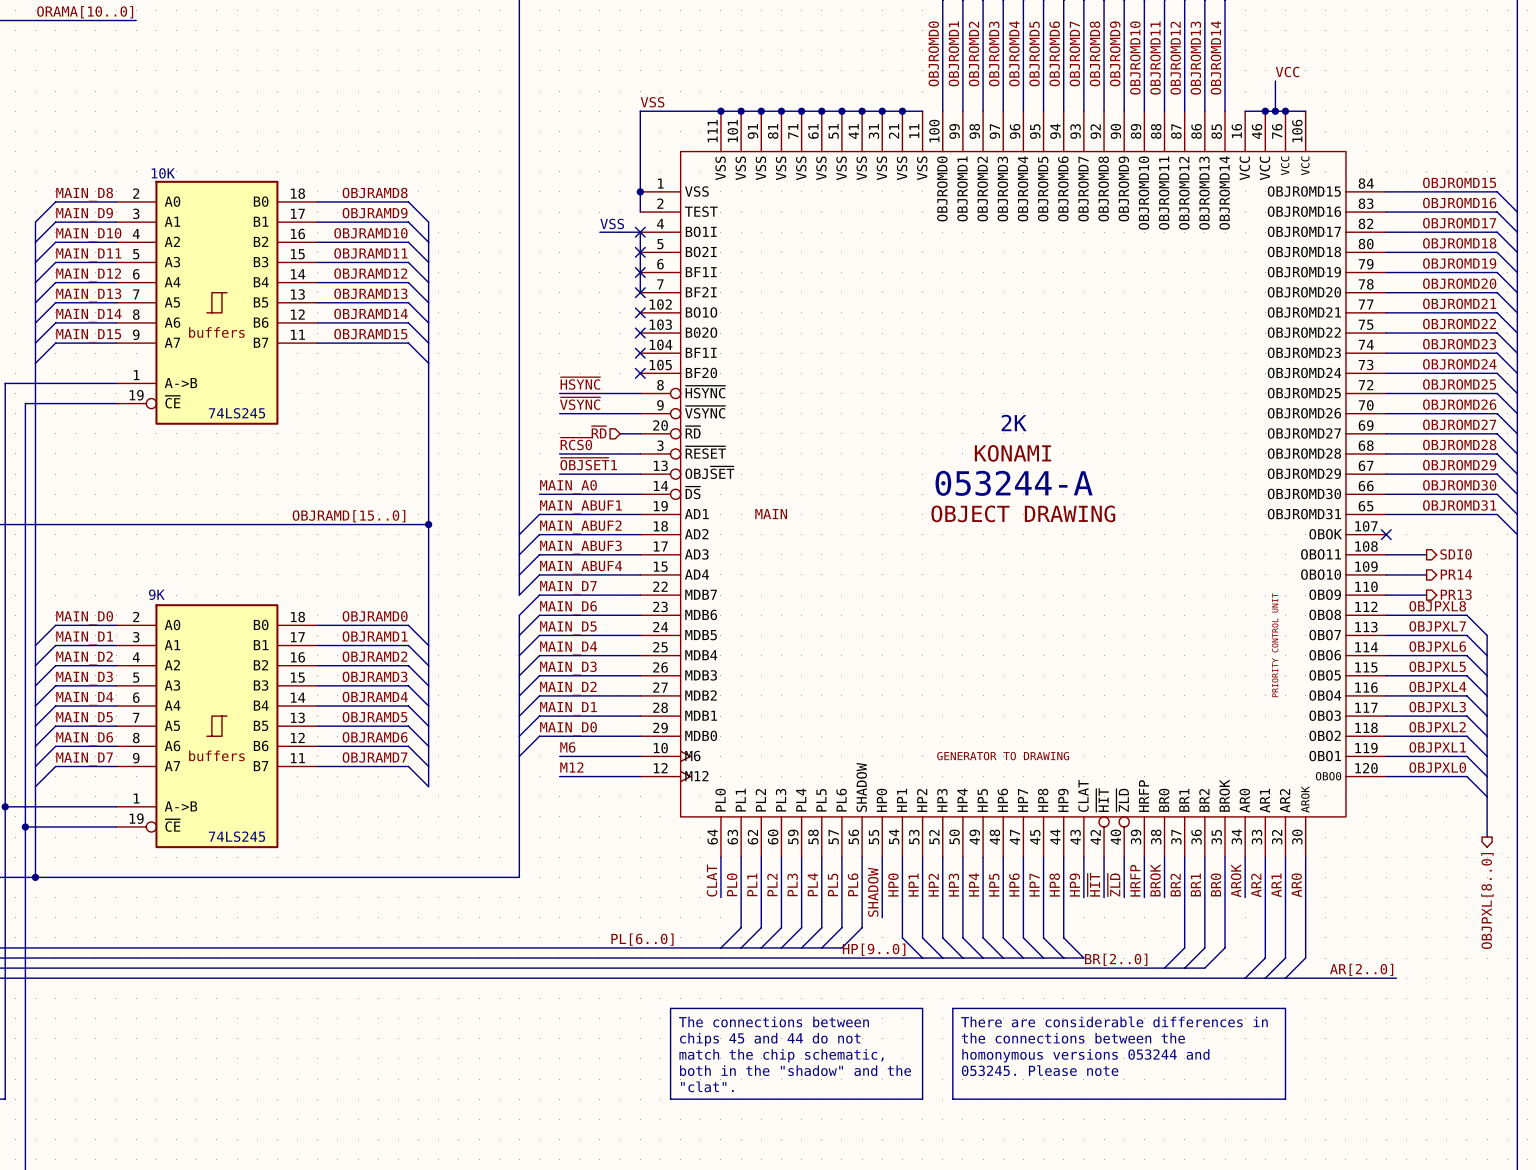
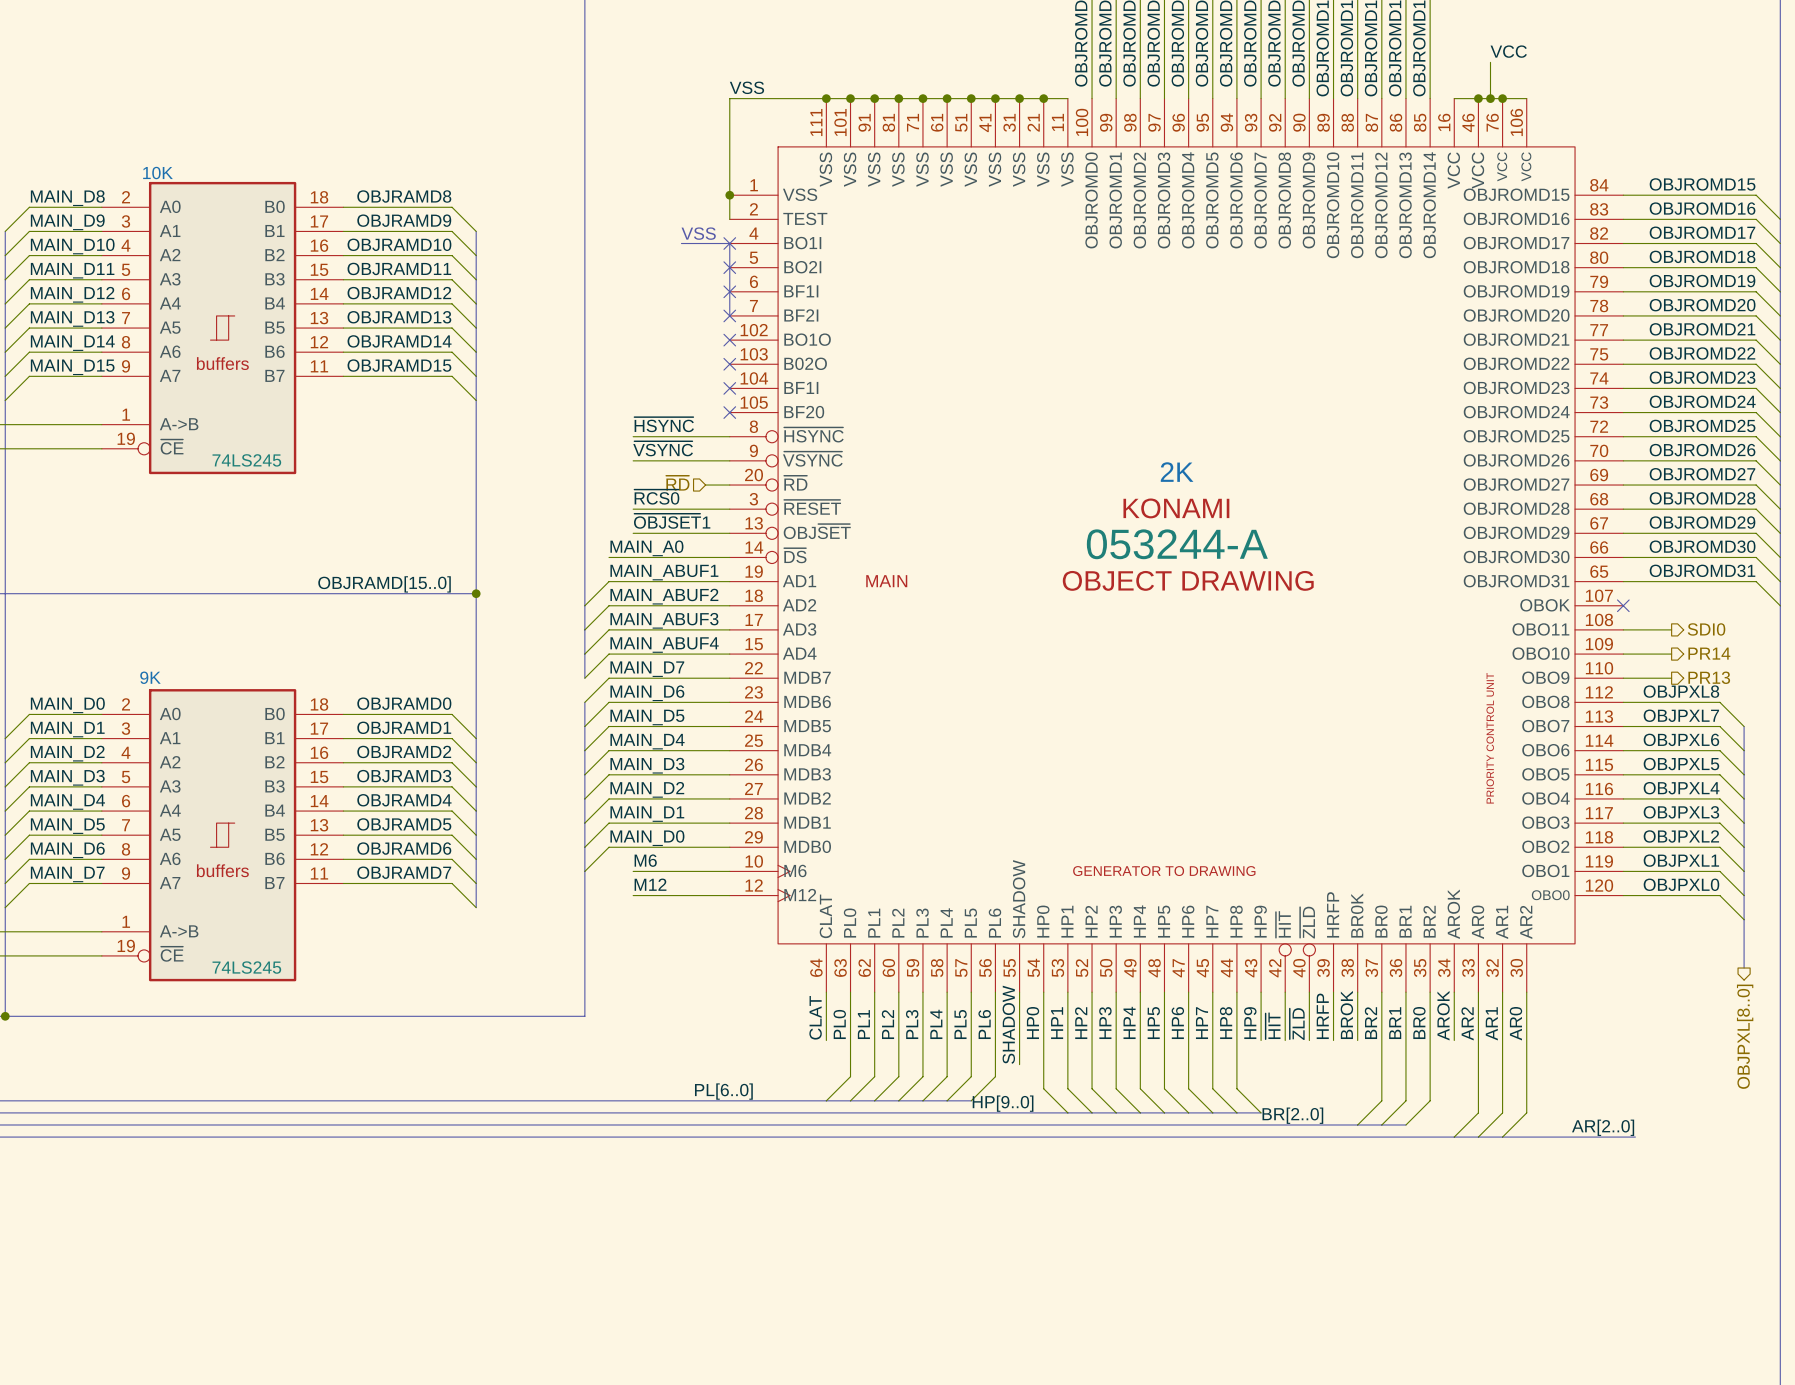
2K symbol: [640, 111, 1387, 858] -> [729, 98, 1624, 993]
line: (670, 1008) (922, 1008) (922, 1099) (670, 1099) (670, 1008) -> none
line: (952, 1008) (1285, 1008) (1285, 1099) (952, 1099) (952, 1008) -> none
text: There are considerable differences in (1114, 1021) -> none
text: The connections between (774, 1022) -> none
text: the connections between the (1073, 1038) -> none
text: chips 45 and 44 do not (770, 1039) -> none
text: match the chip schematic, (781, 1055) -> none
text: homonymous versions 053244 and (1085, 1055) -> none
text: both in the "shadow" and the (795, 1070) -> none
text: 053245. Please note (1040, 1070) -> none
text: "clat". (707, 1086) -> none

